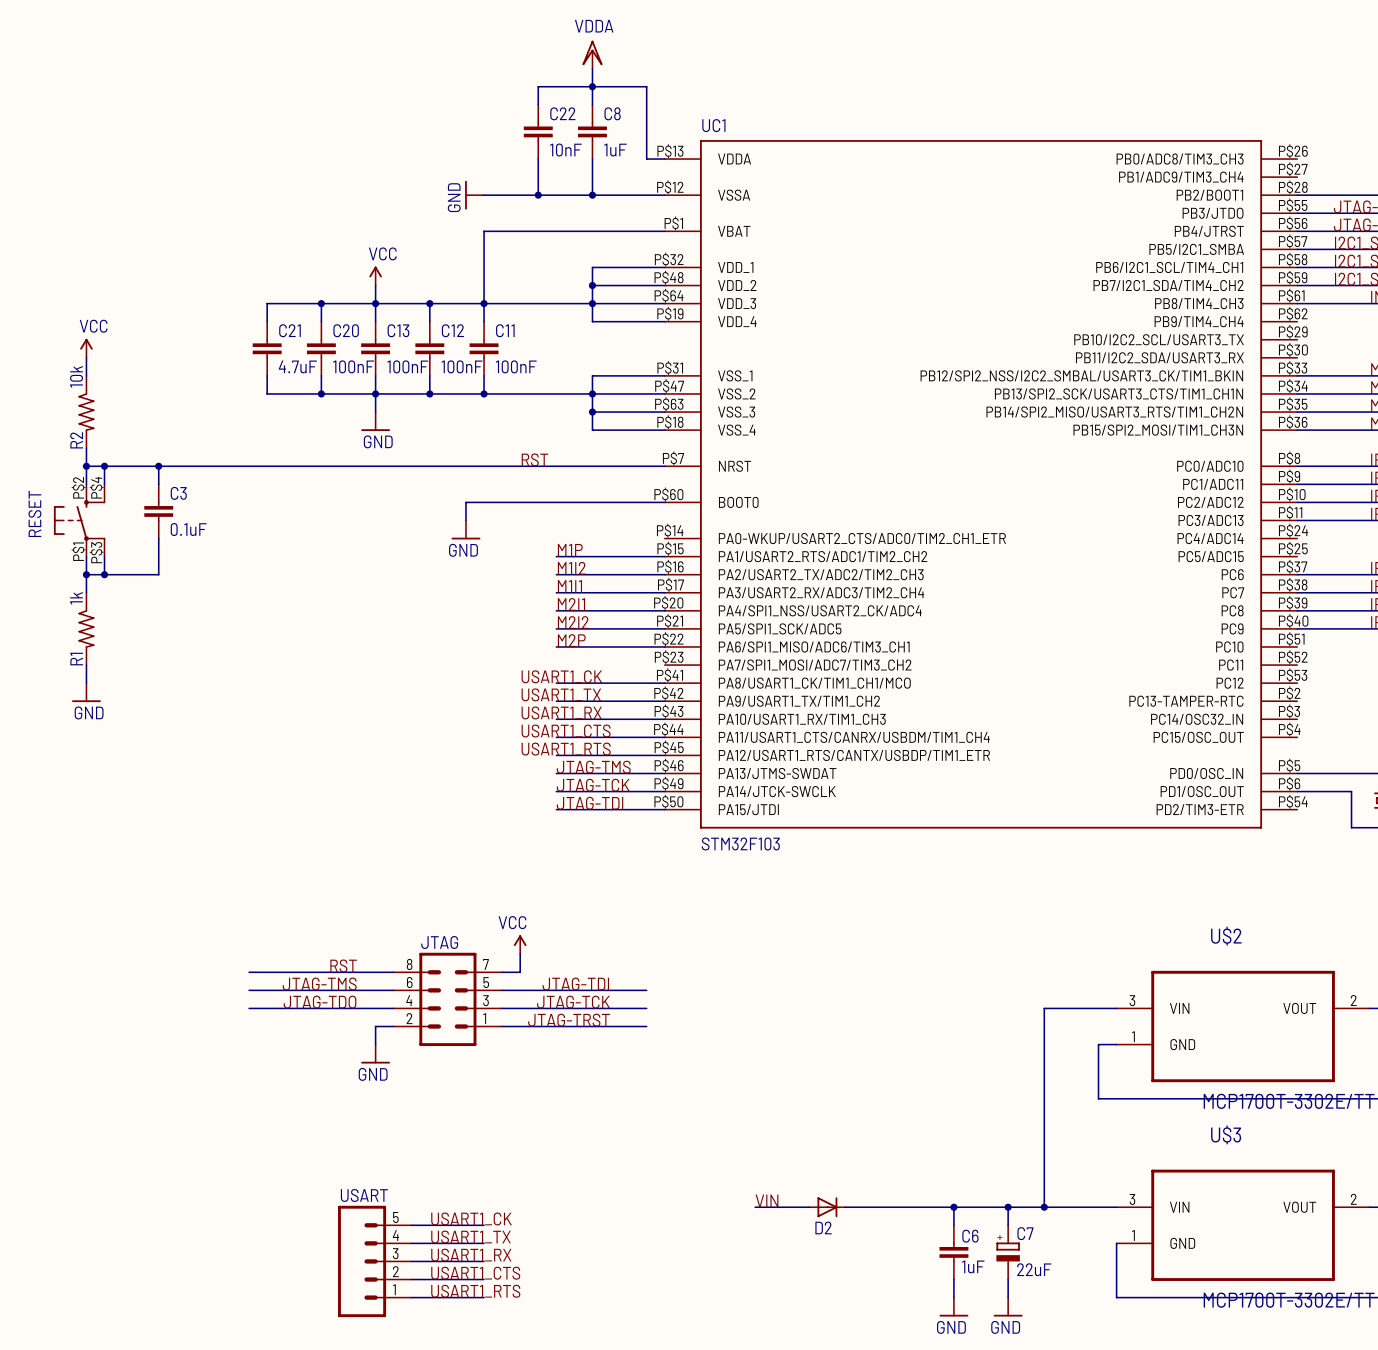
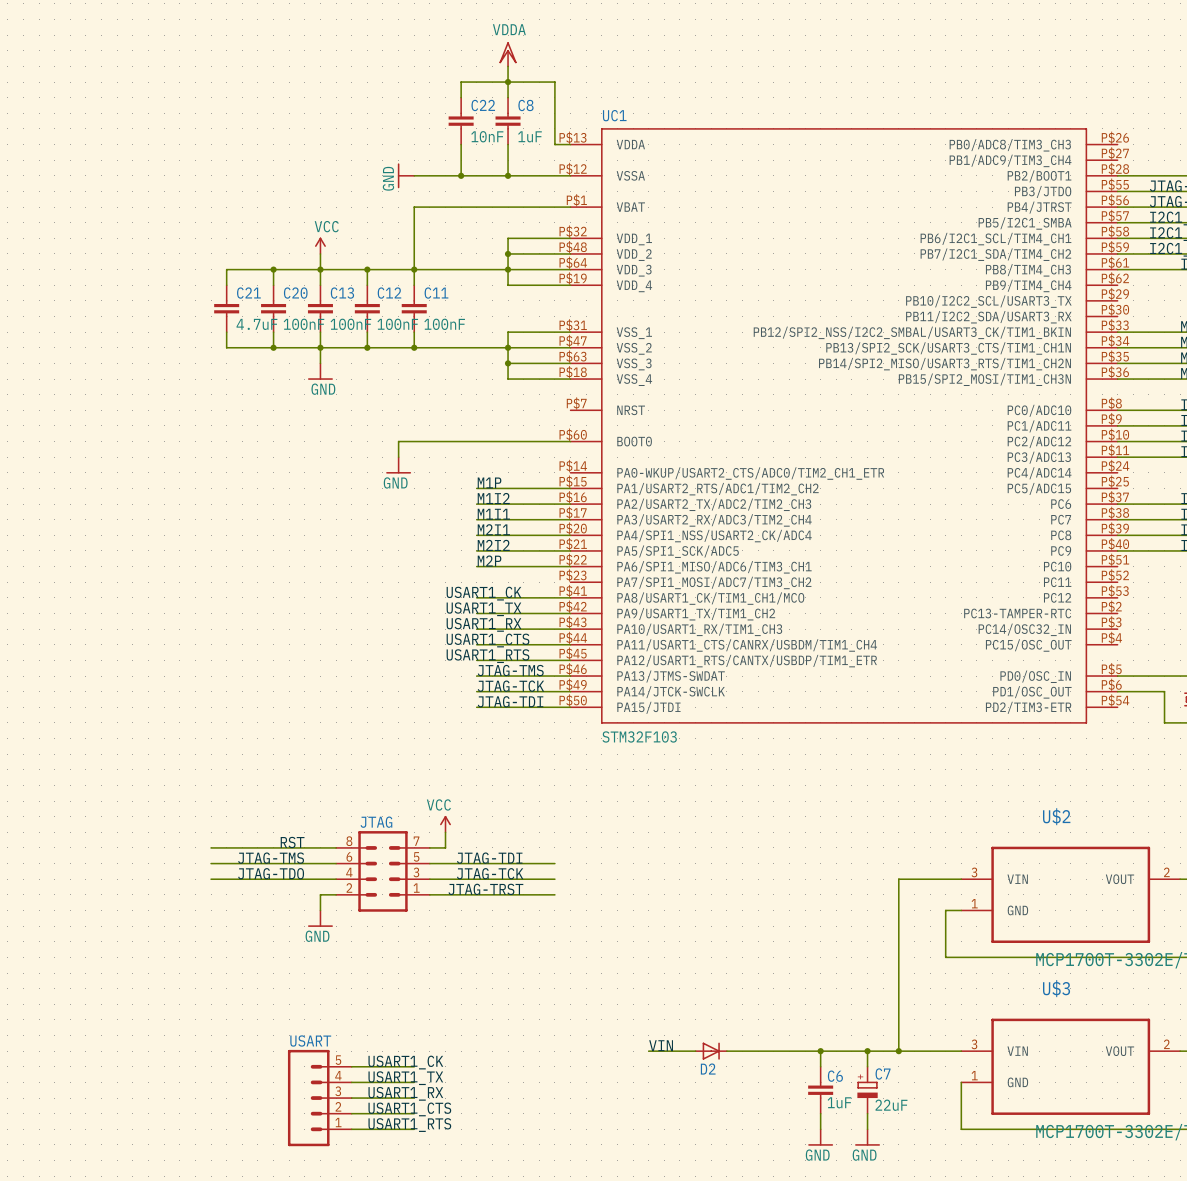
power symbol: VCC (86, 348) -> none
wire: (86, 357) (86, 375) -> none
R2: 10k (86, 412) -> none
wire: (86, 448) (86, 484) -> none
label: RST (534, 459) -> none
wire: (86, 466) (664, 466) -> none
junction: (86, 466) -> none
wire: (104, 466) (104, 484) -> none
junction: (104, 466) -> none
wire: (158, 466) (158, 484) -> none
junction: (158, 466) -> none
C3: 0.1uF (158, 511) -> none
RESET: (79, 520) -> none
wire: (158, 538) (158, 574) (86, 574) -> none
wire: (86, 556) (86, 592) -> none
wire: (104, 556) (104, 574) -> none
junction: (86, 574) -> none
junction: (104, 574) -> none
R1: 1k (86, 628) -> none
wire: (86, 665) (86, 683) -> none
power symbol: GND (86, 692) -> none

